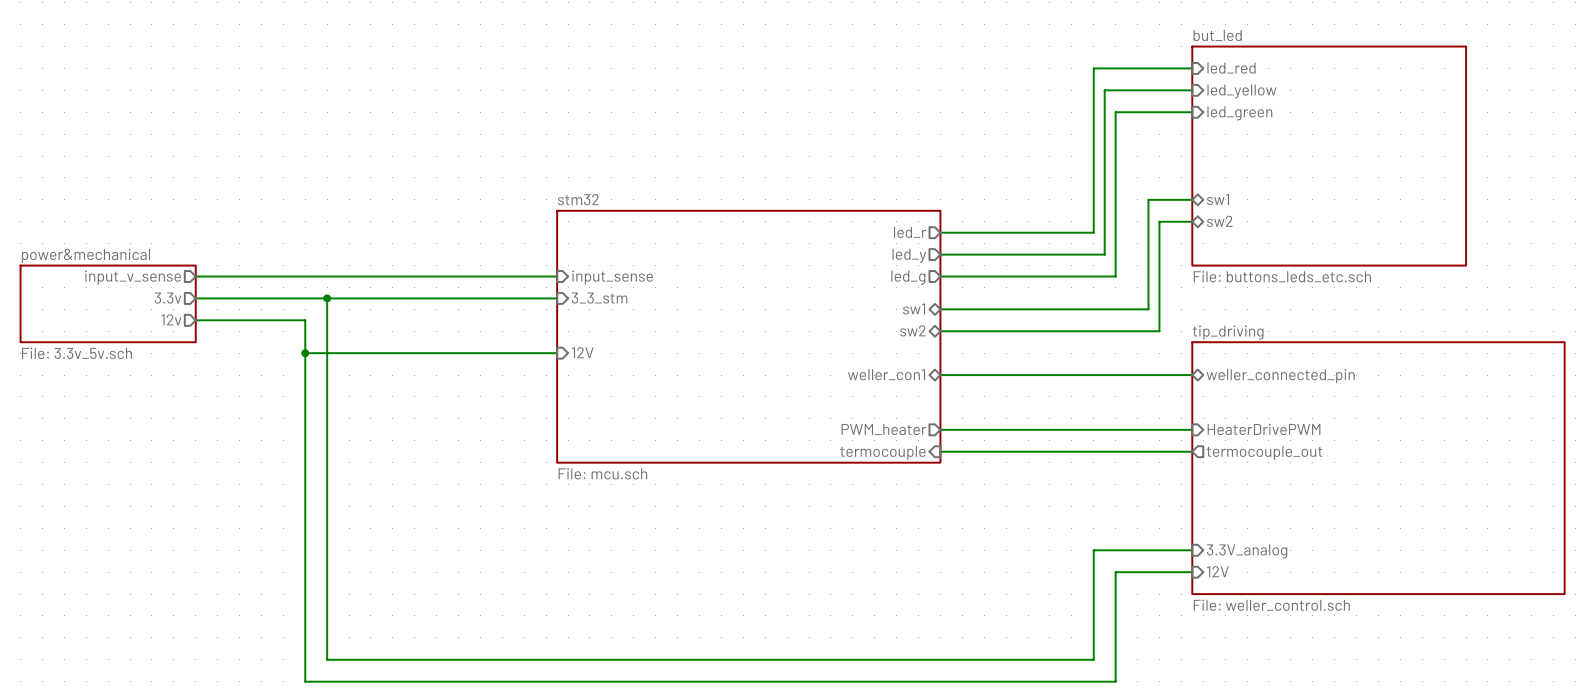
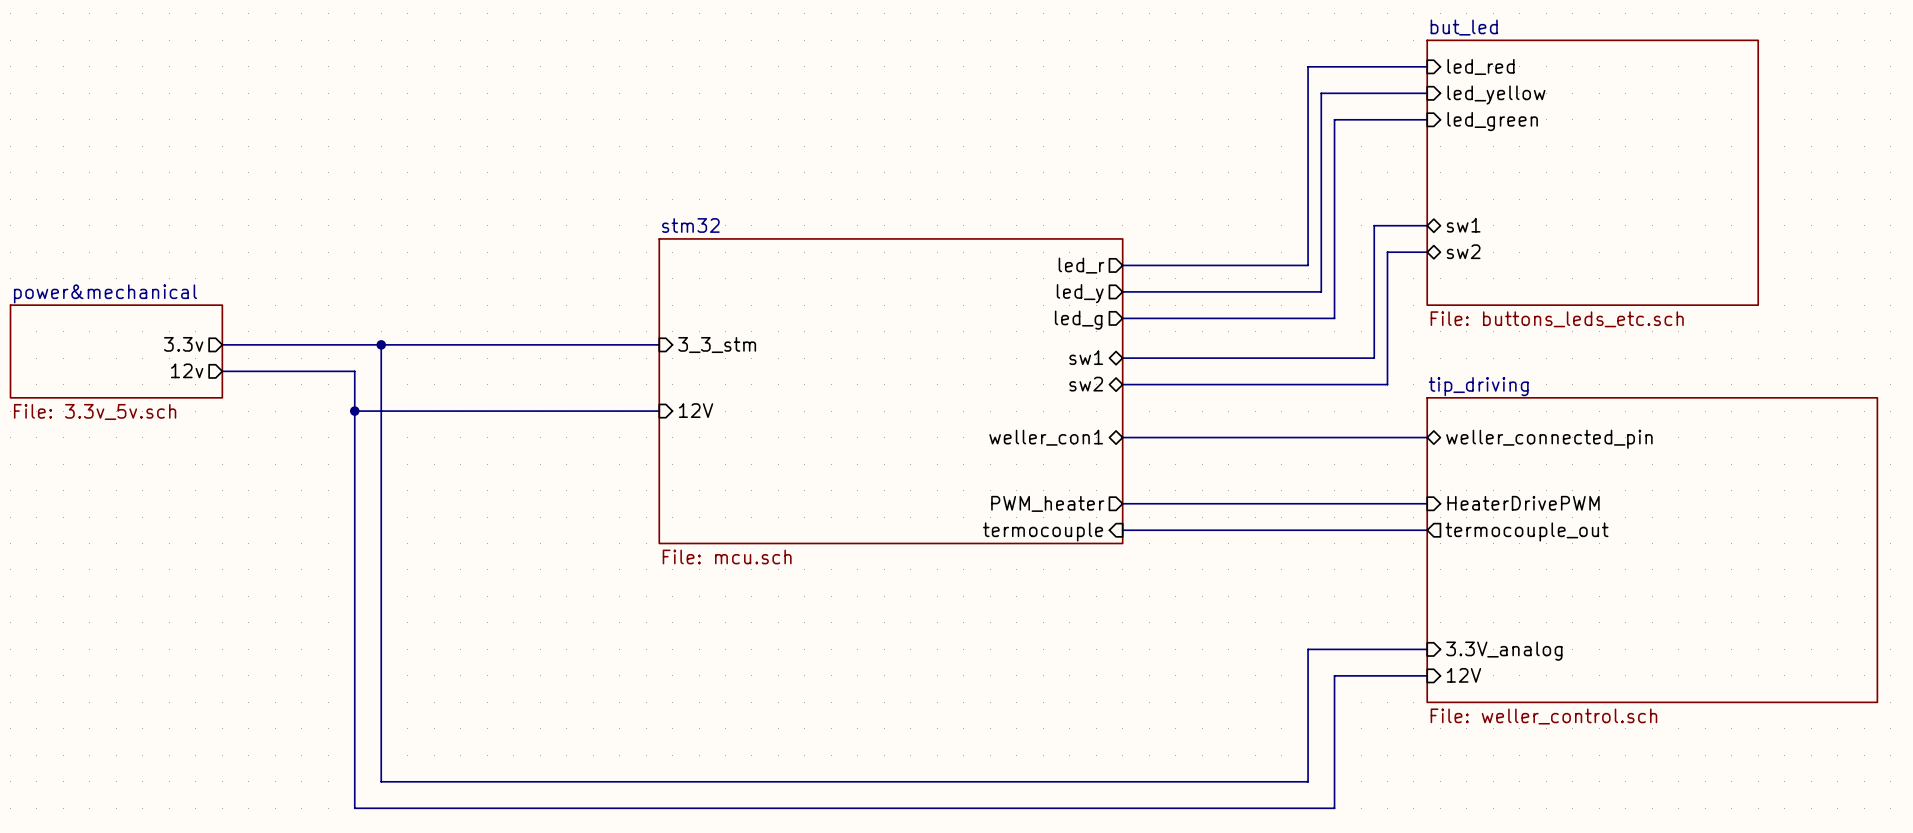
wire: (195, 276) (557, 276) -> none
sheet pin: input_v_sense (133, 277) -> none
sheet pin: input_sense (612, 277) -> none

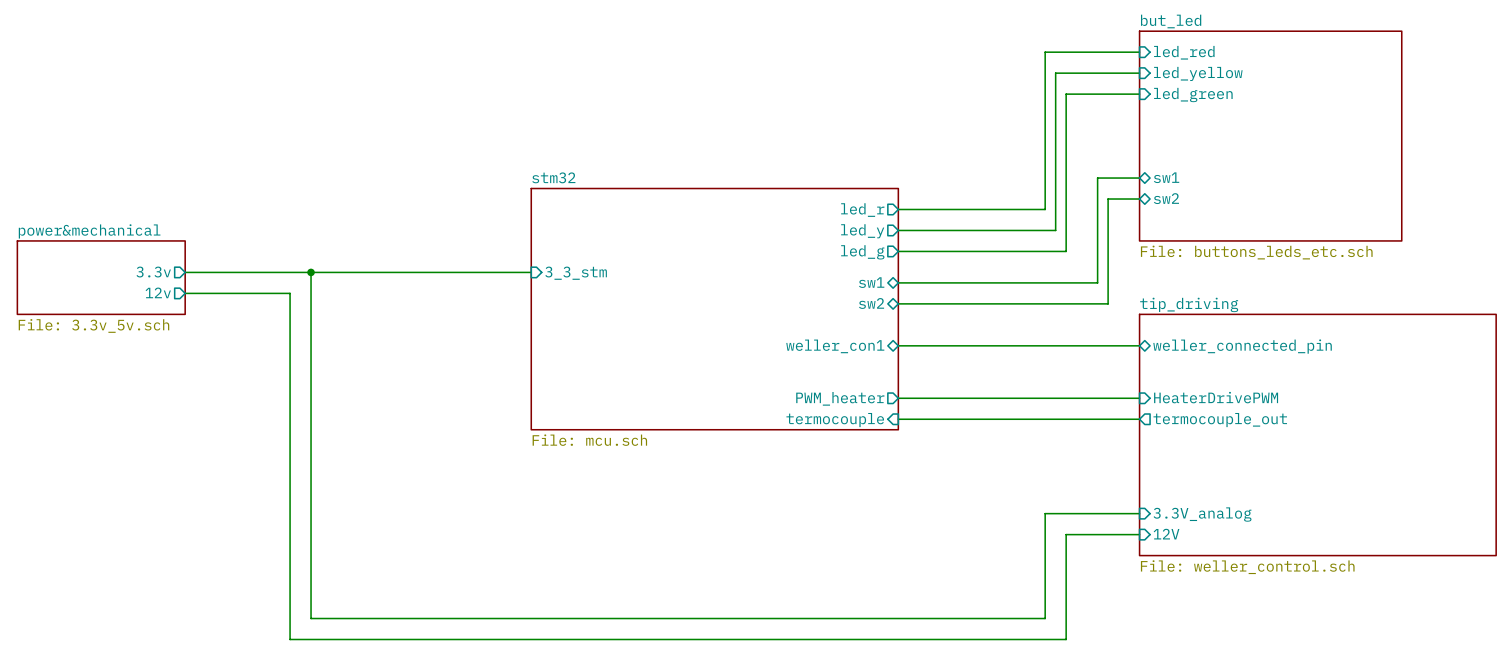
sheet pin: 12V (696, 410) -> none
wire: (354, 411) (659, 411) -> none
junction: (354, 411) -> none

